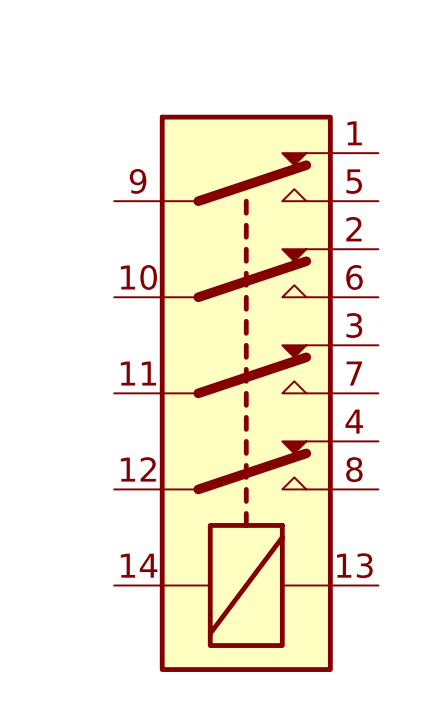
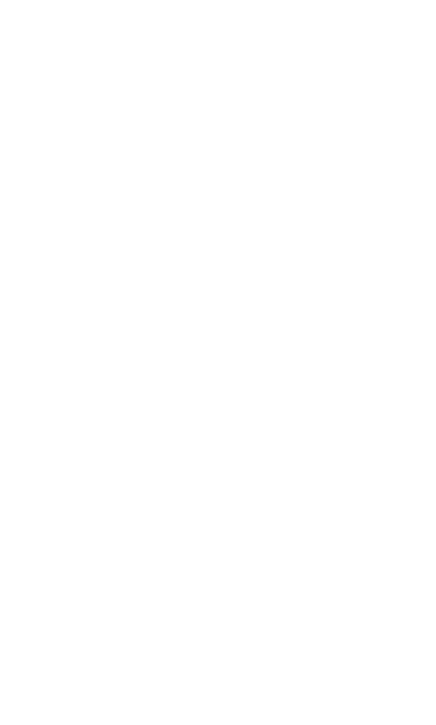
part: (246, 393) -> none

